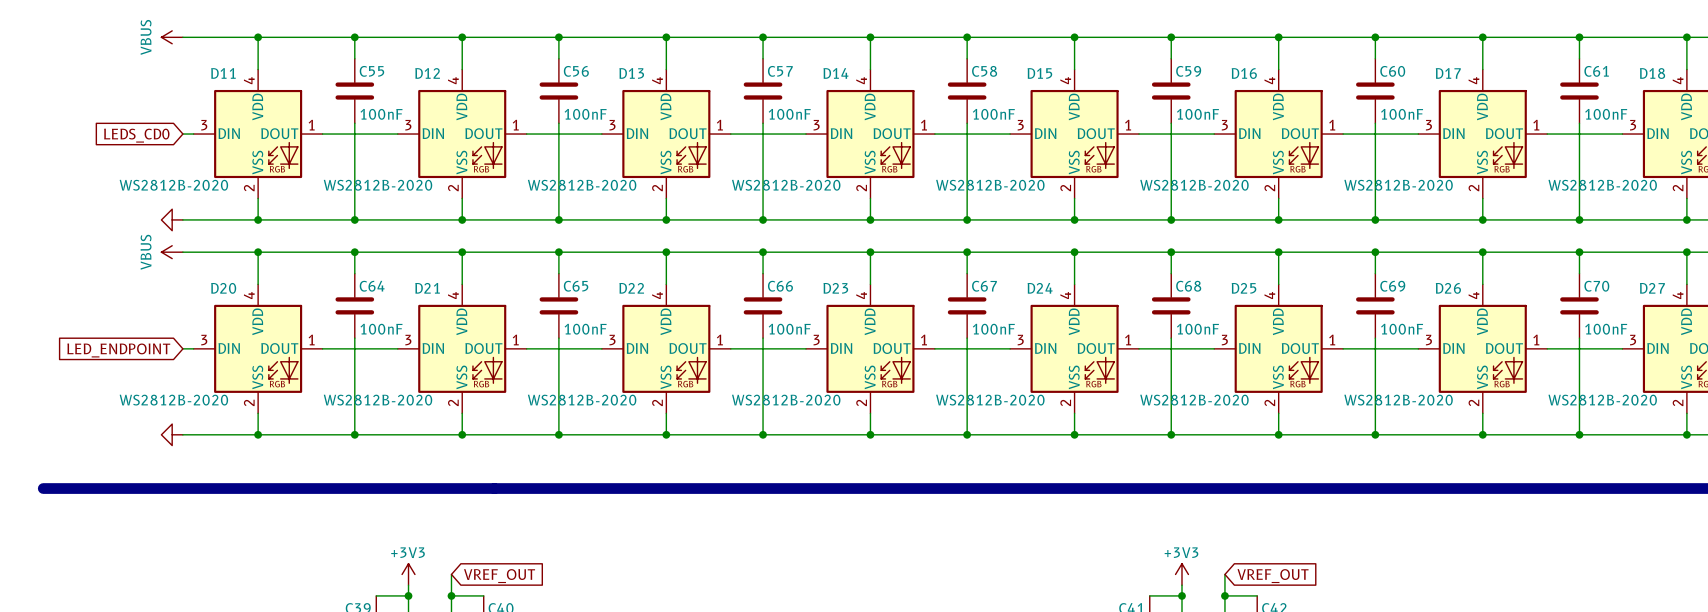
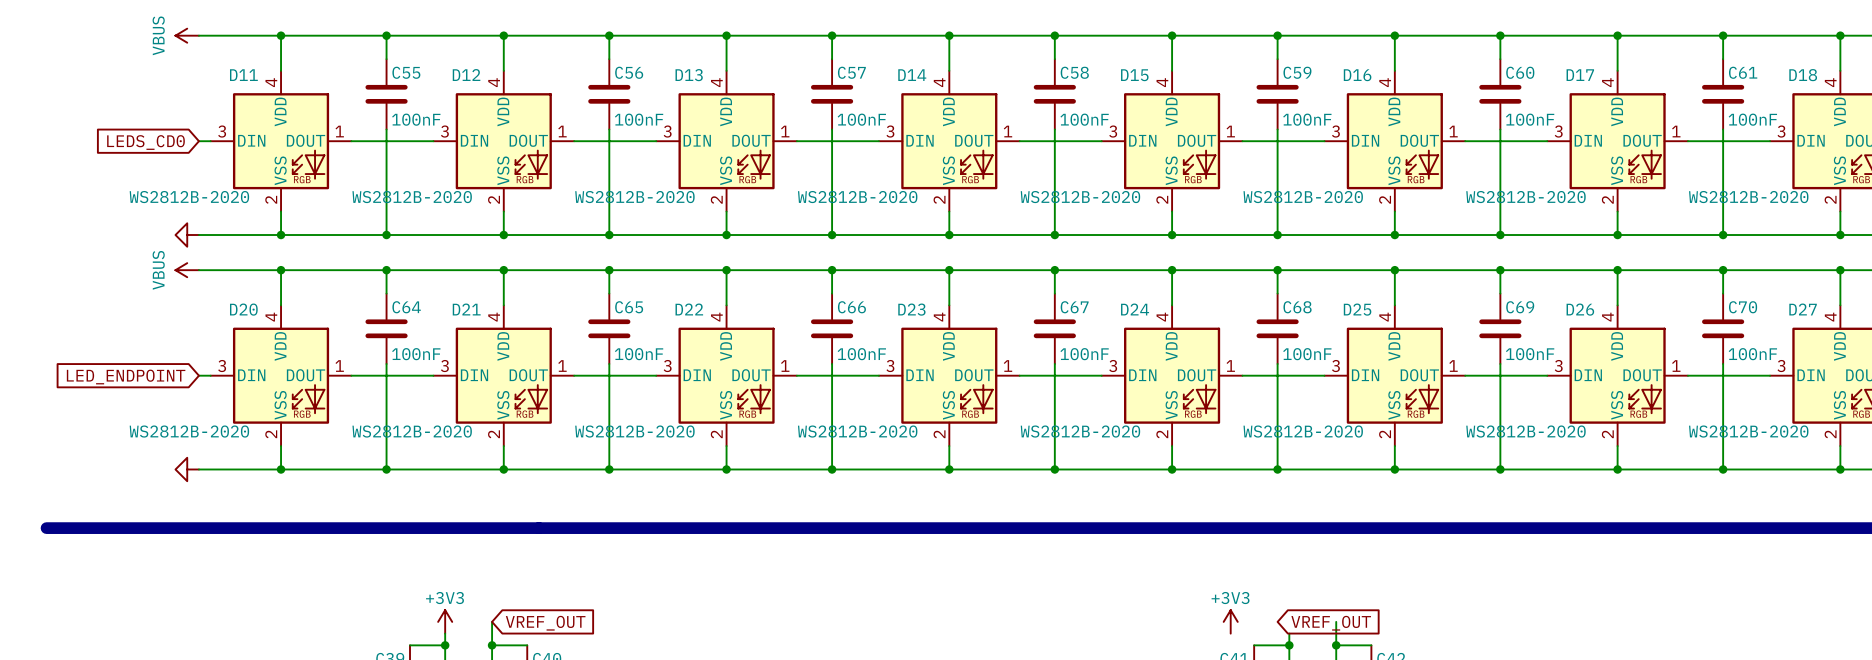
power symbol position: +3V3 (1181, 574) -> +3V3 (1230, 621)
global label position: VREF_OUT (1273, 576) -> VREF_OUT (1331, 623)

